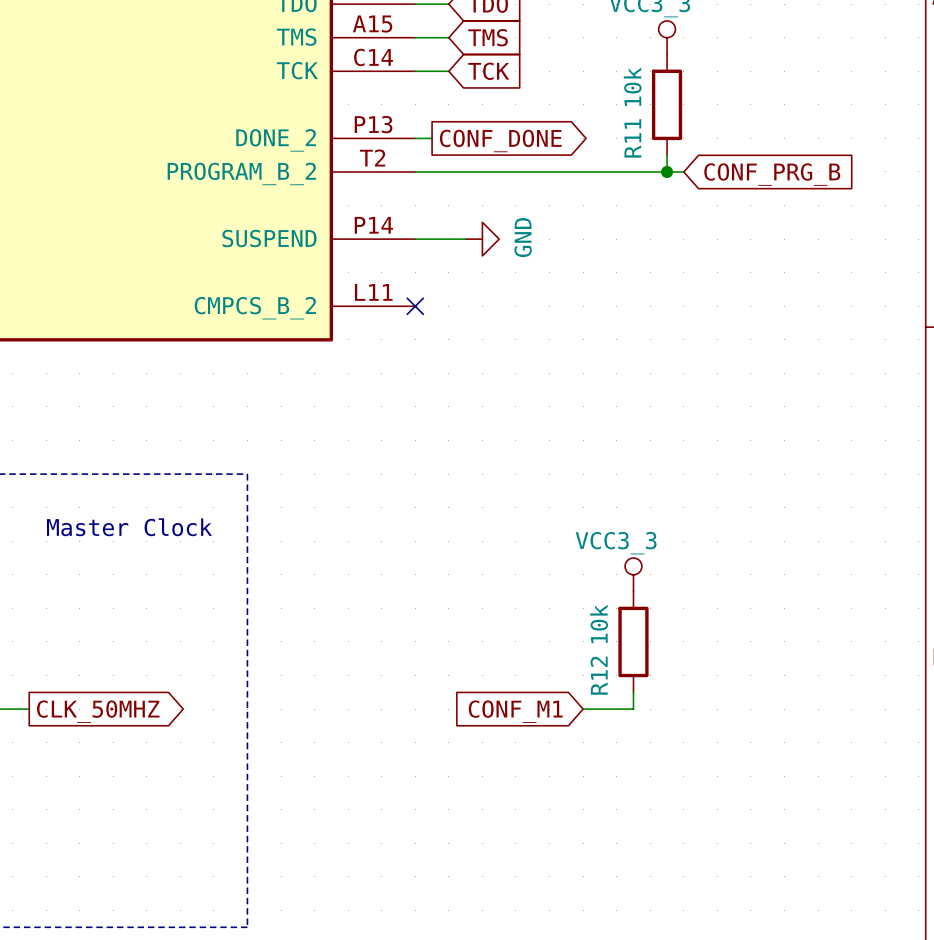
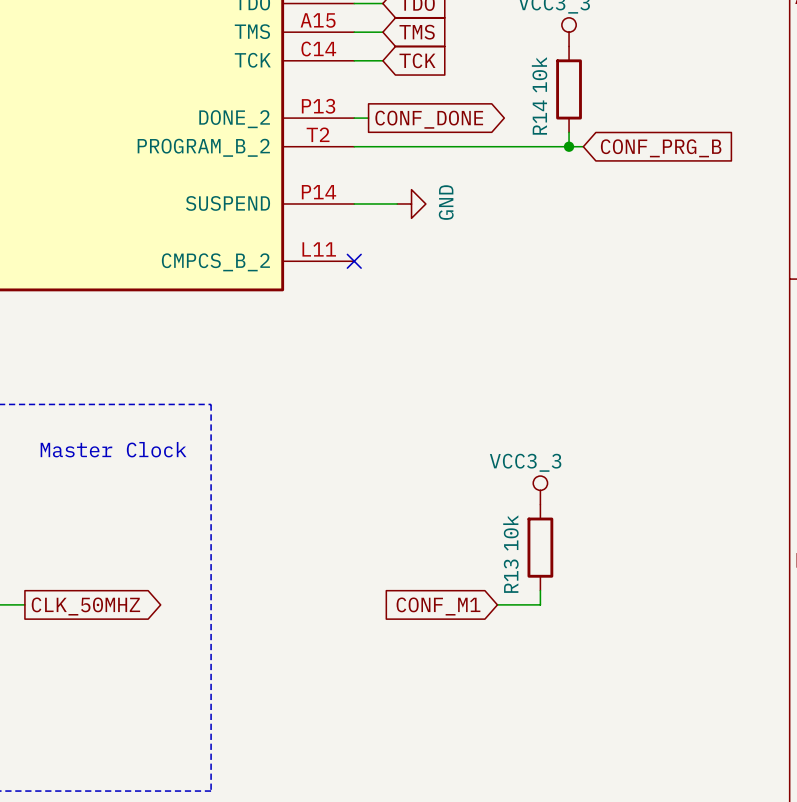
R11 name: R11 (632, 138) -> R14 (539, 117)
R12 name: R12 (599, 675) -> R13 (511, 576)

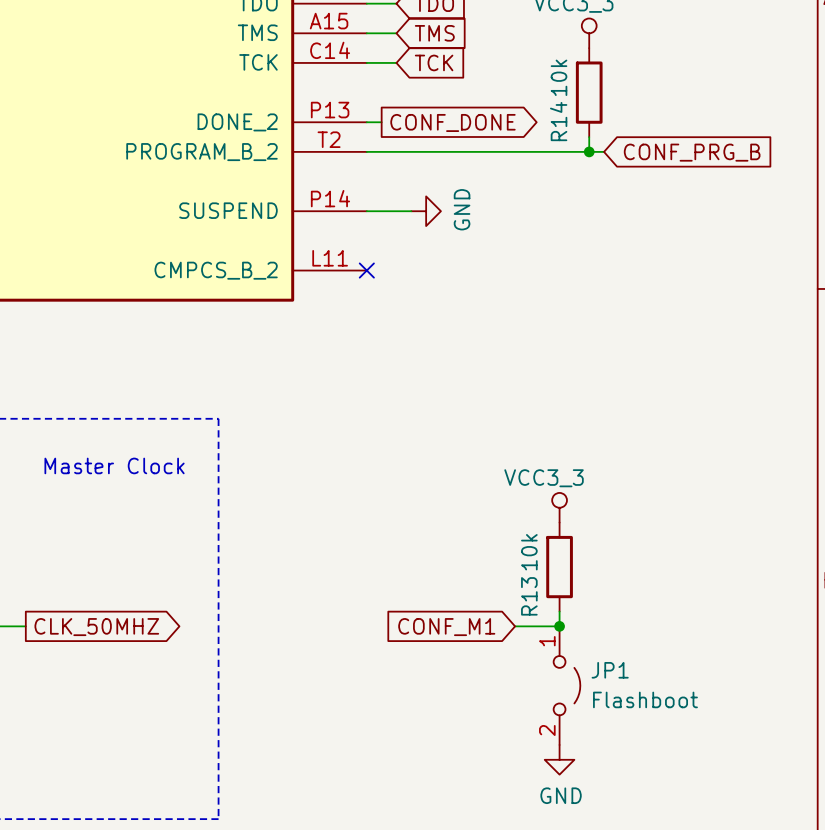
junction: none -> (559, 626)
JP1: none -> Flashboot (566, 685)
power symbol: none -> GND (559, 759)

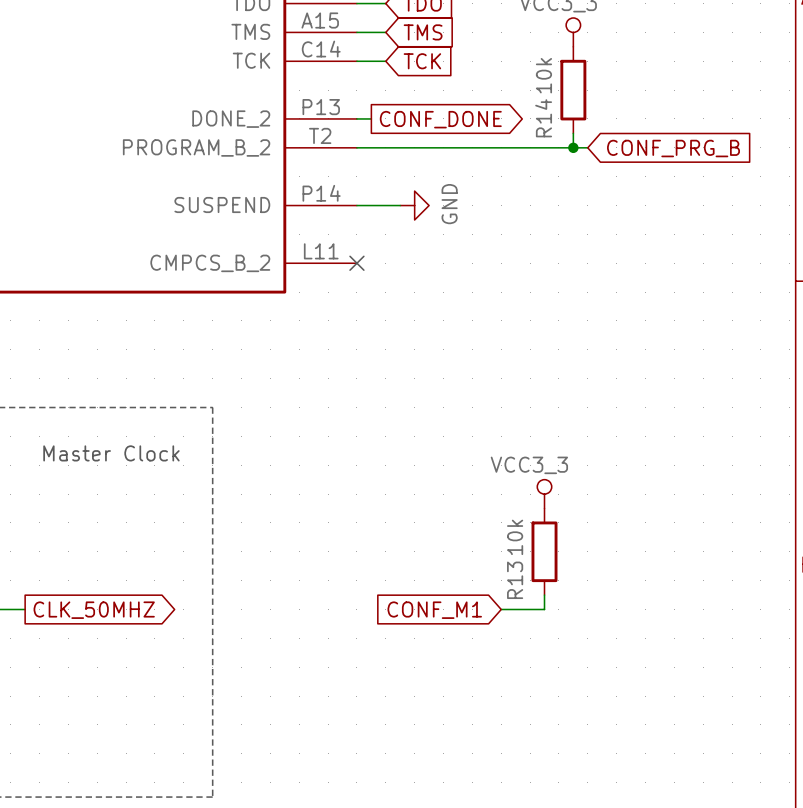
junction: (559, 626) -> none
JP1: Flashboot (566, 685) -> none
power symbol: GND (559, 759) -> none

